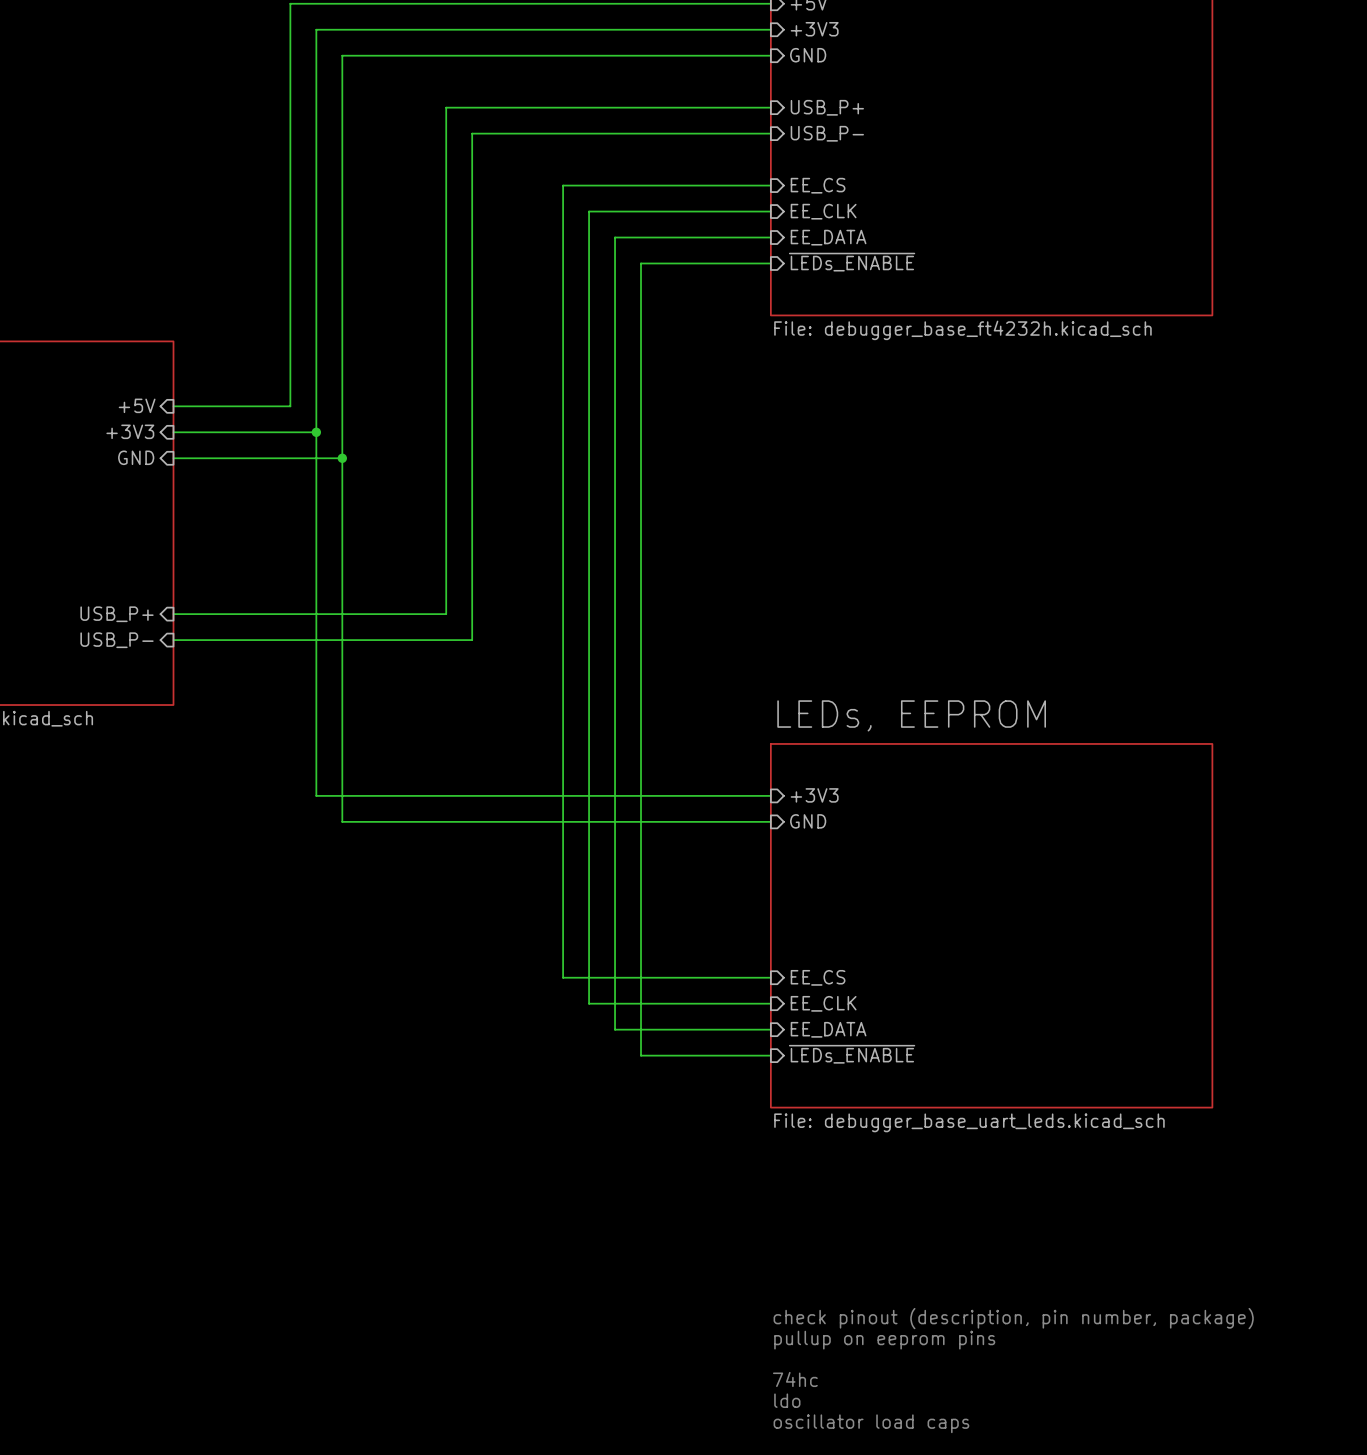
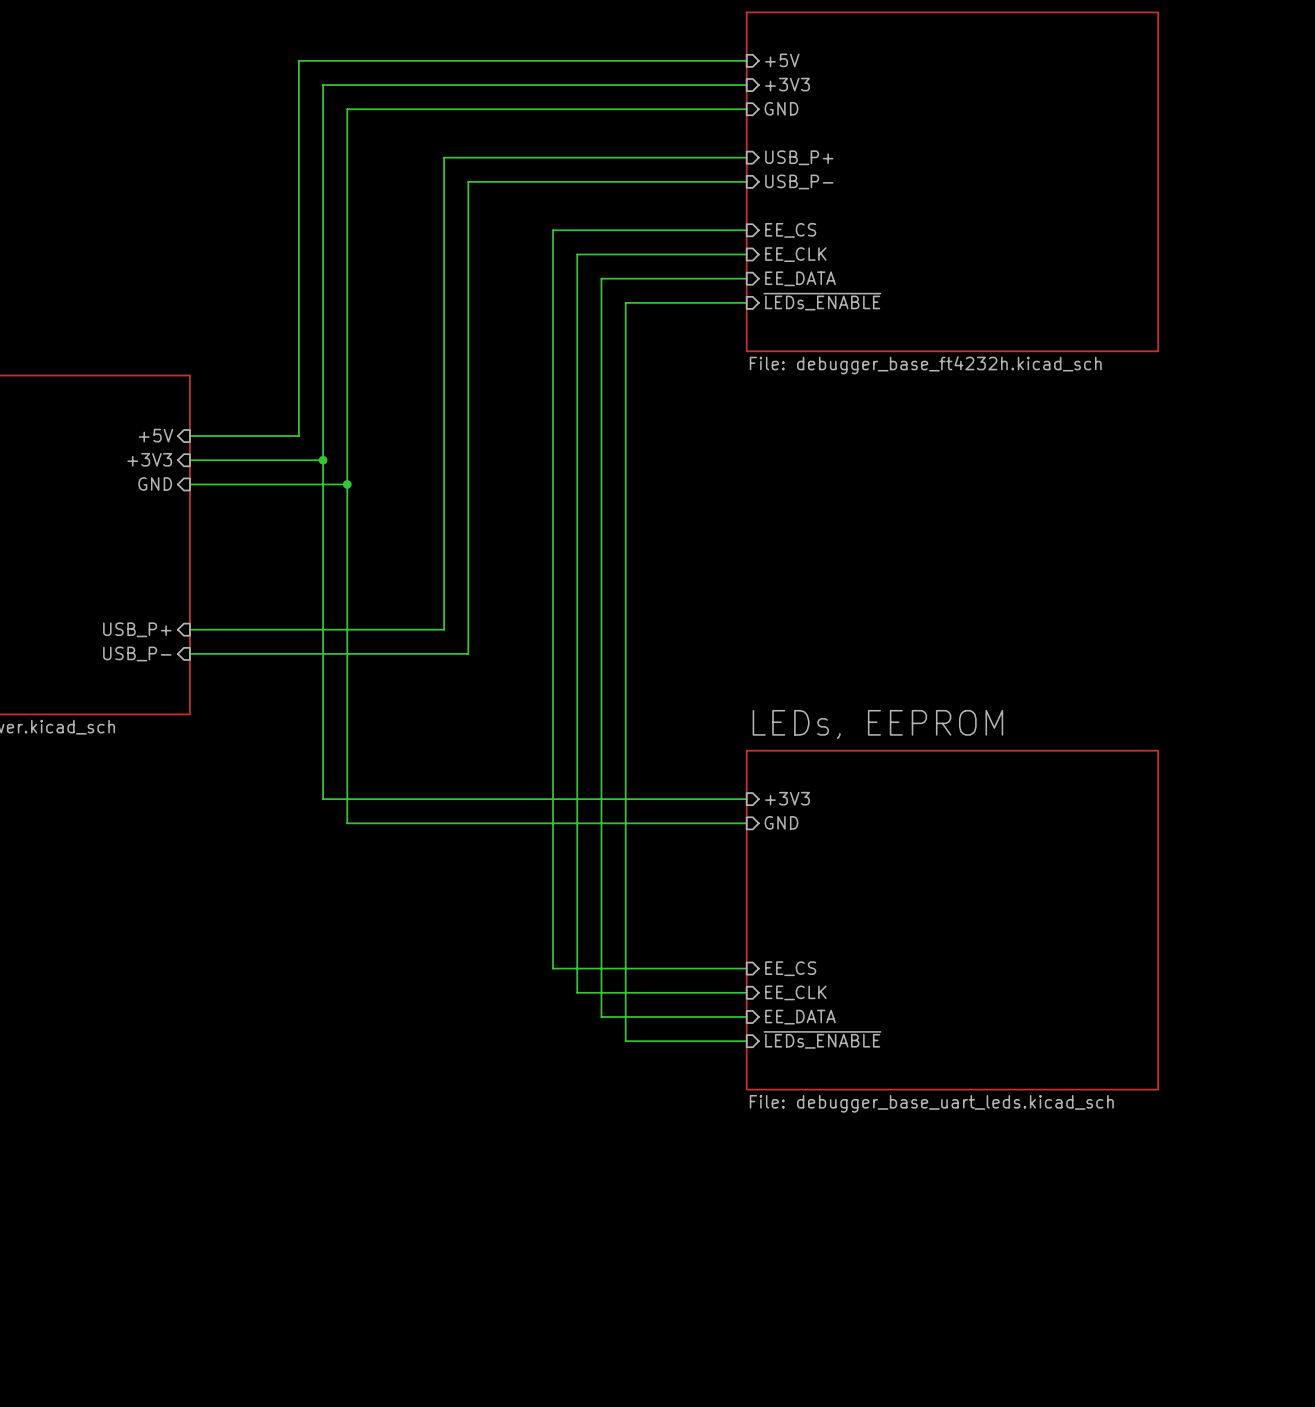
text: check pinout (description, pin number, package) (1013, 1318) -> none
text: pullup on eeprom pins (884, 1340) -> none
text: 74hc (795, 1379) -> none
text: ldo (787, 1400) -> none
text: oscillator load caps (871, 1423) -> none

